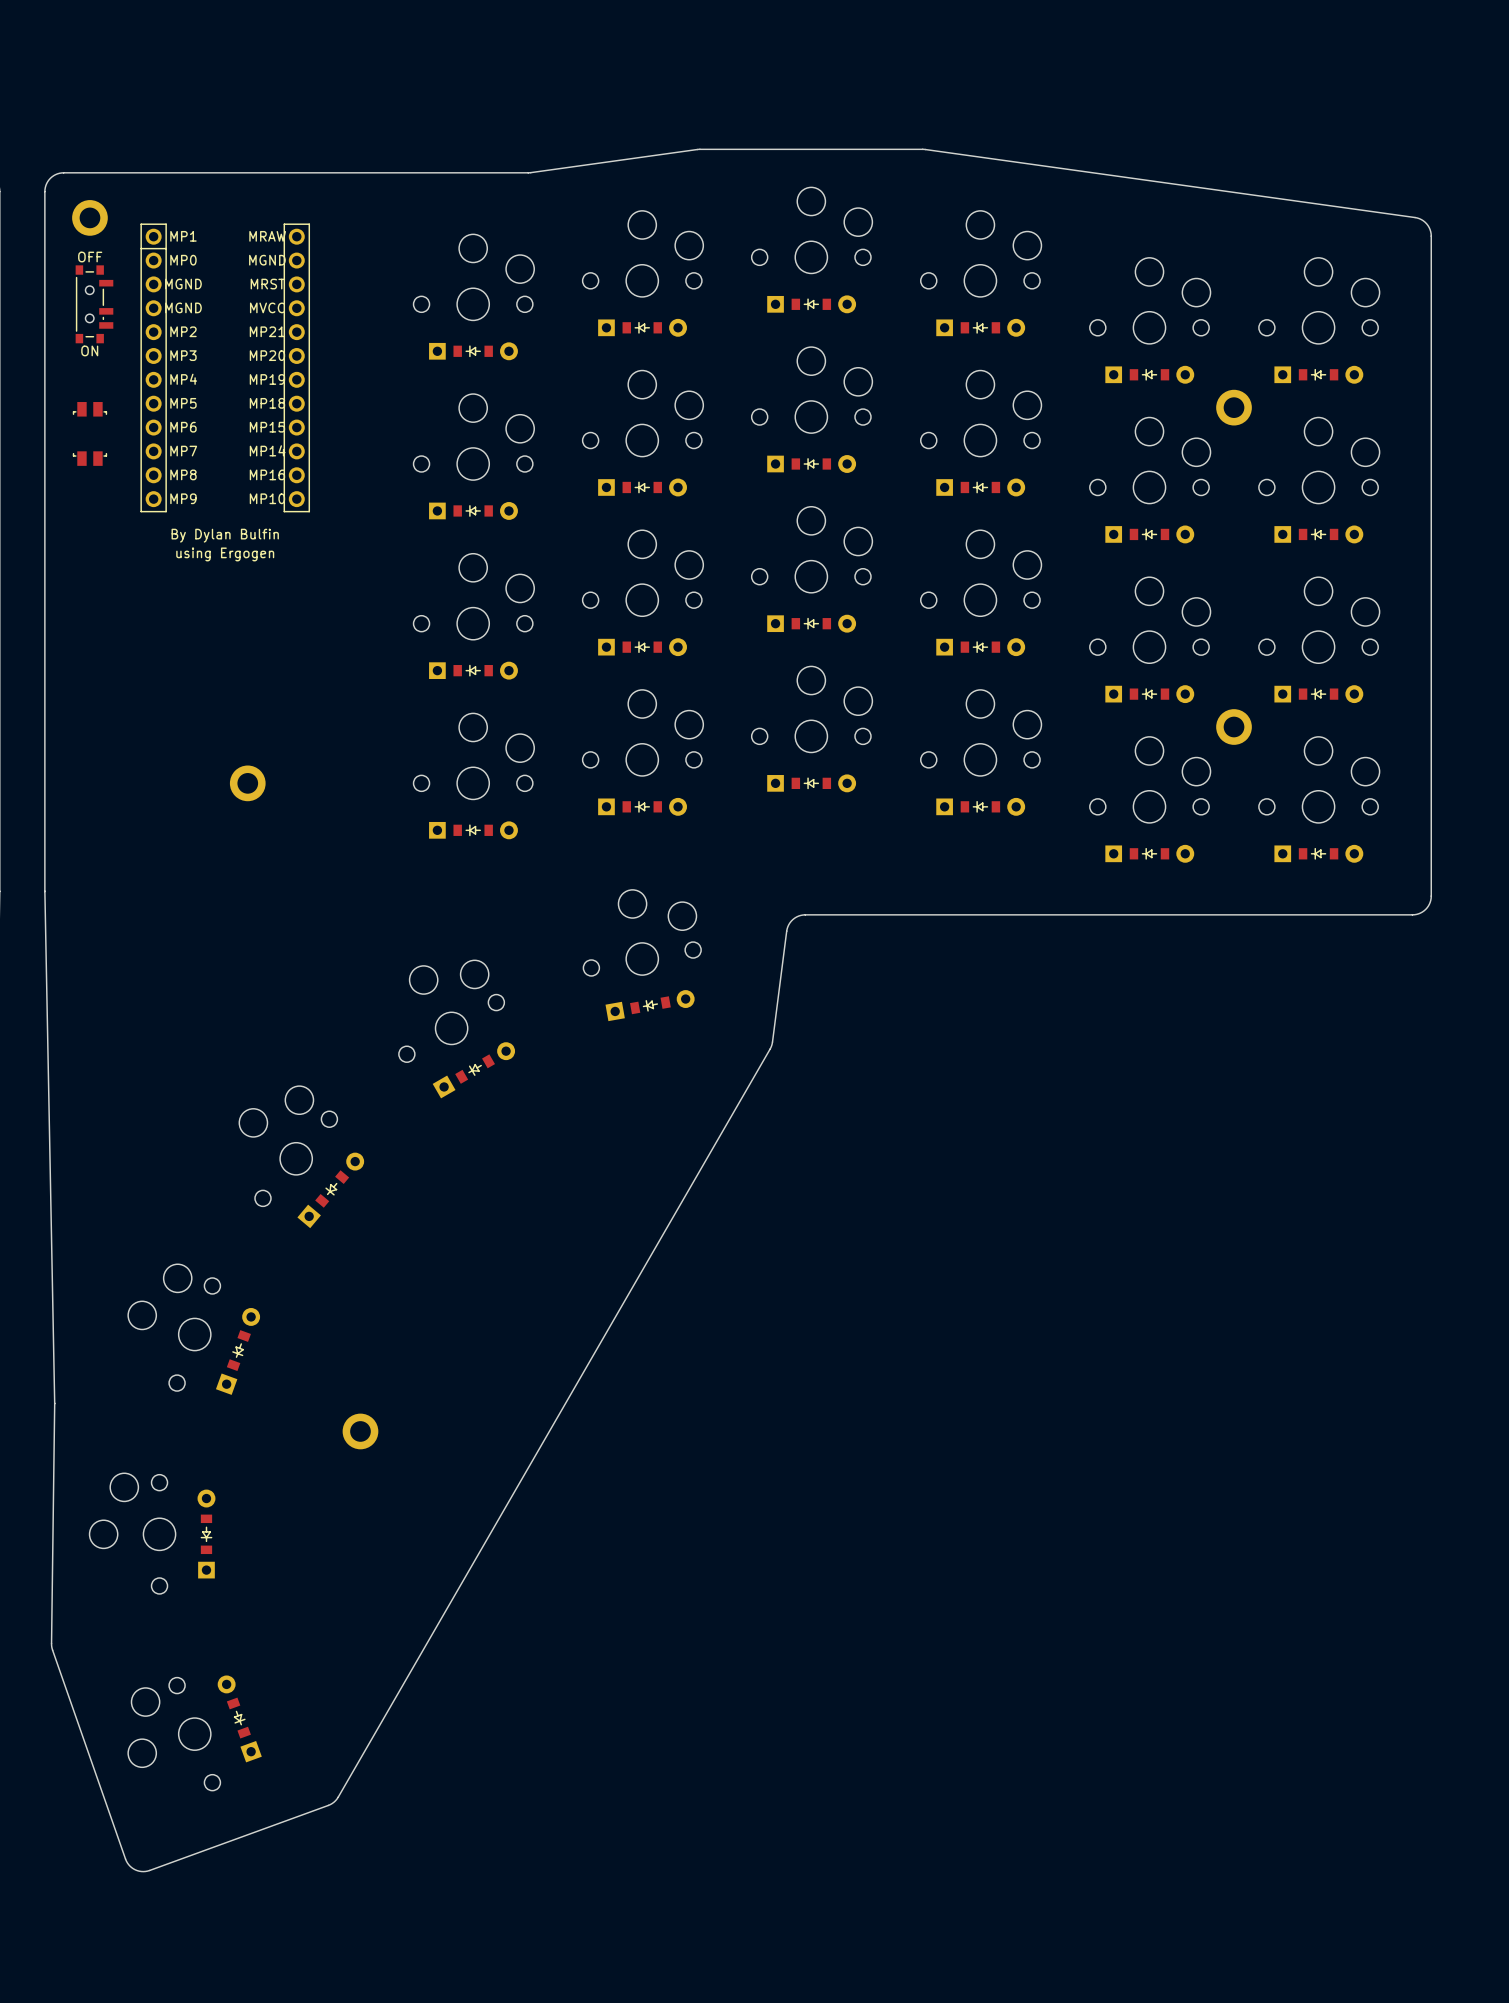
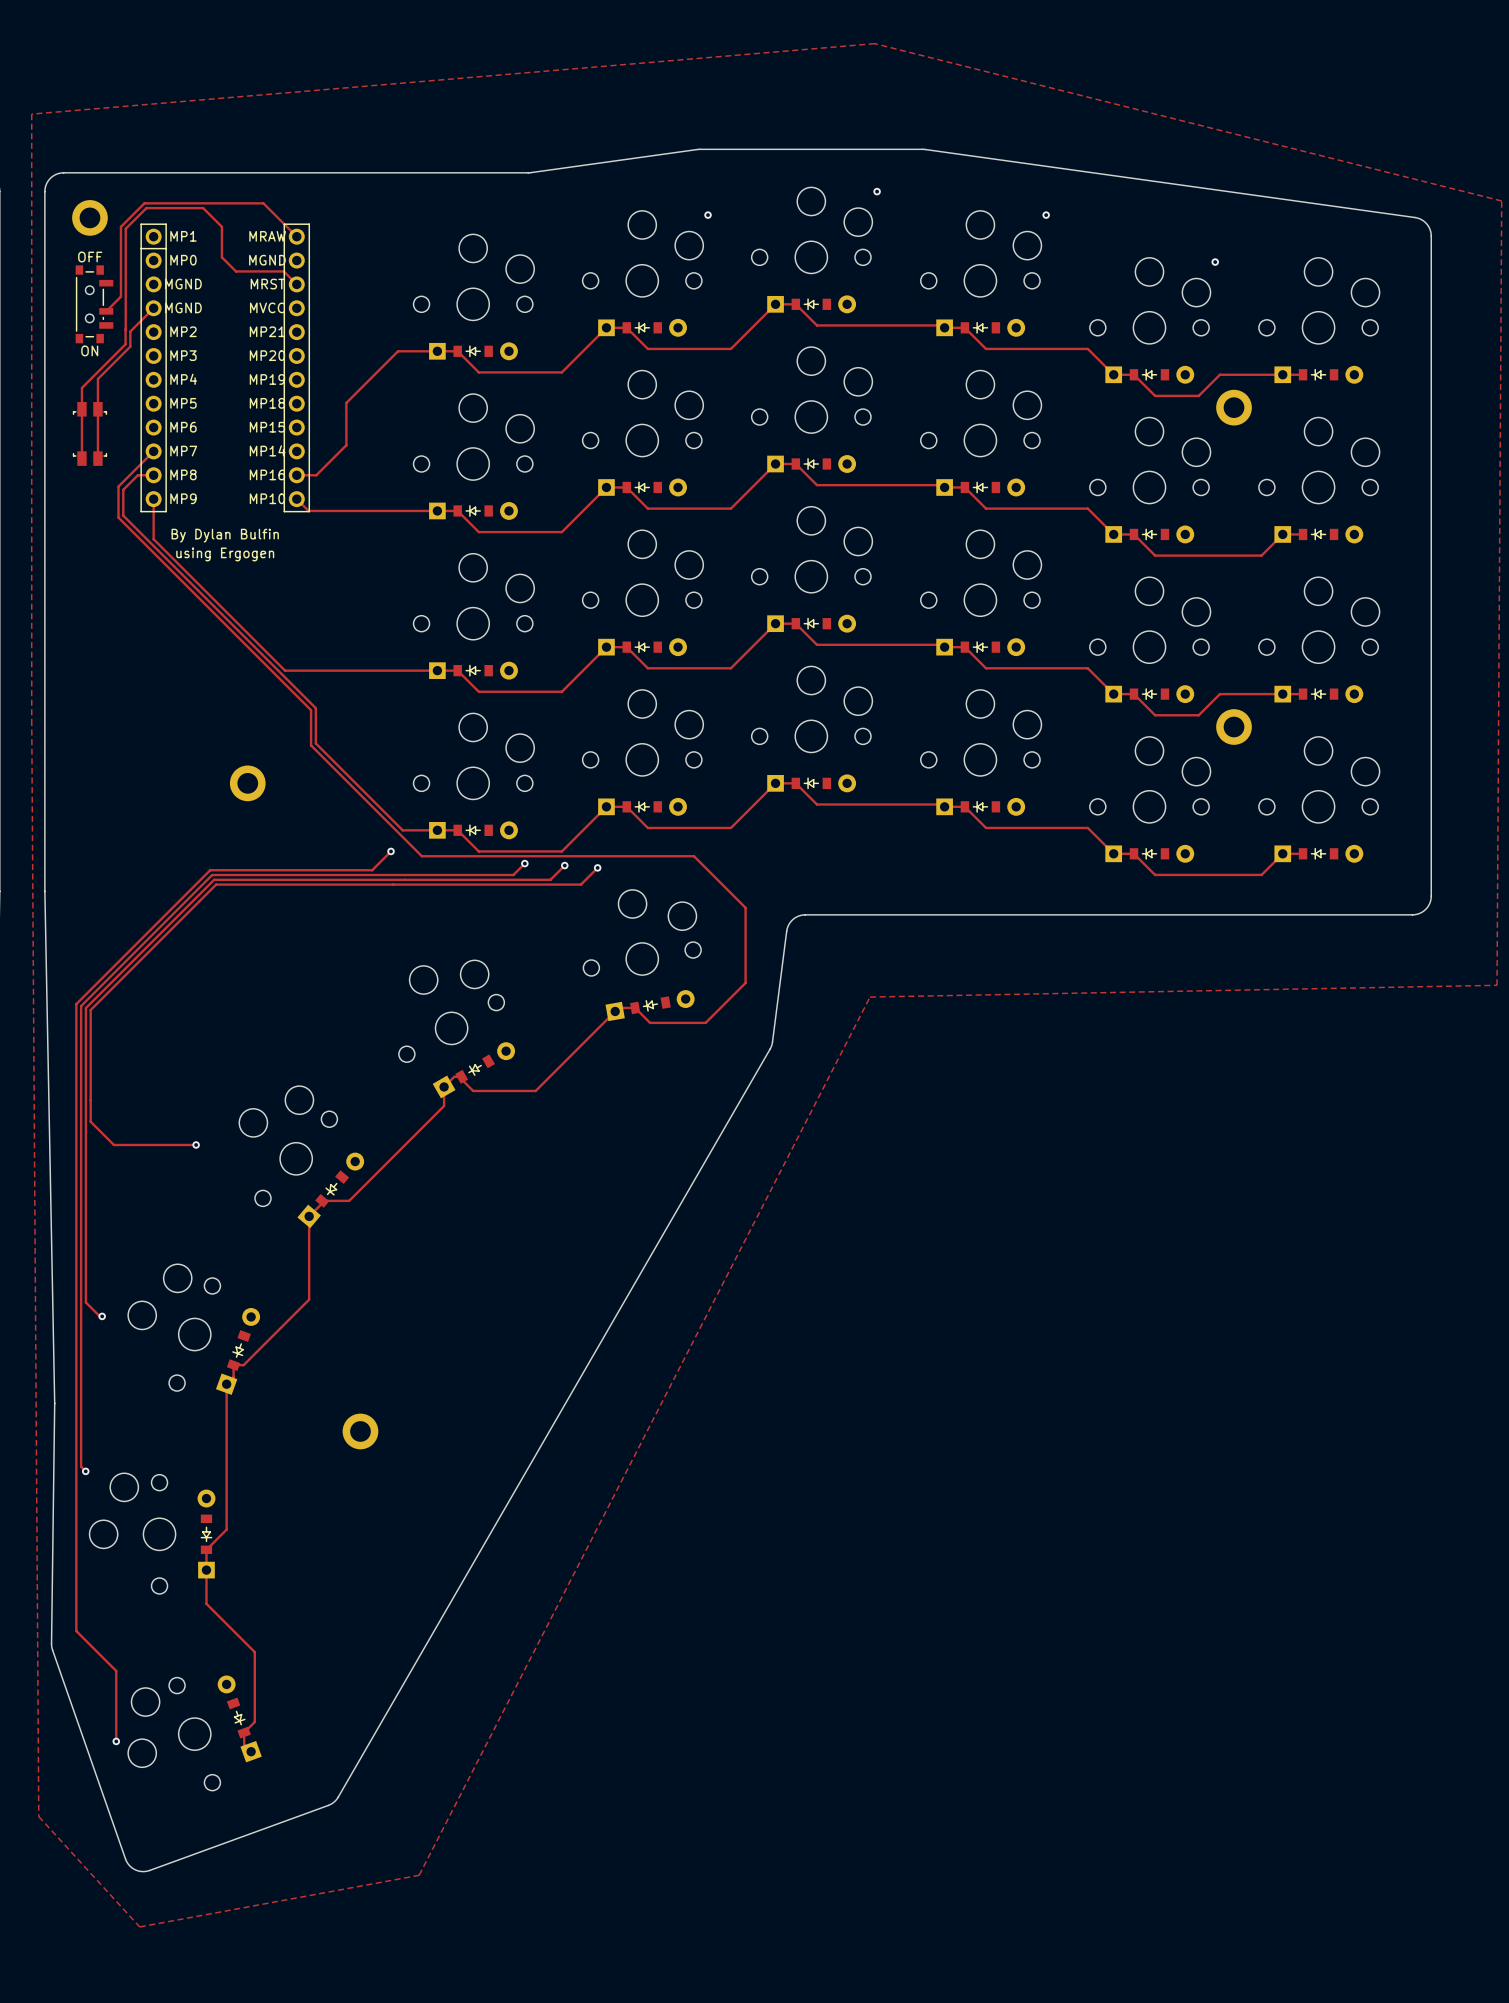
zone outline: none -> (874, 43) (1501, 201) (1497, 985) (870, 997) (419, 1875) (139, 1926) (38, 1816) (31, 719) (31, 114) (874, 43)
via: none -> (877, 191)
via: none -> (708, 215)
via: none -> (1046, 215)
track: none -> (296, 236) (263, 203) (144, 203) (120, 226) (120, 296) (106, 311)
via: none -> (1215, 262)
track: none -> (296, 284) (283, 271) (236, 271) (221, 257) (221, 226) (203, 208) (146, 208) (125, 228) (125, 344) (81, 387) (81, 458)
track: none -> (153, 308) (130, 331) (130, 346) (97, 378) (97, 458)
track: none -> (1303, 374) (1219, 374) (1198, 395) (1155, 395) (1133, 374) (1113, 374) (1087, 348) (986, 348) (964, 327) (944, 327) (942, 325) (816, 325) (795, 304) (775, 304) (730, 348) (647, 348) (626, 327) (606, 327) (561, 372) (478, 372) (457, 351) (398, 351) (346, 402) (346, 445) (316, 475) (296, 475)
track: none -> (153, 451) (118, 486) (118, 517) (311, 710) (311, 745) (421, 856) (694, 856) (745, 907) (745, 982) (705, 1022) (650, 1022) (635, 1007) (618, 1007) (535, 1090) (473, 1090) (461, 1079) (461, 1076) (454, 1076) (444, 1086) (444, 1105) (349, 1200) (322, 1200) (322, 1203) (309, 1216) (309, 1299) (243, 1365) (233, 1365) (233, 1377) (226, 1384) (226, 1529) (206, 1549) (206, 1603) (254, 1652) (254, 1721) (244, 1732) (244, 1744) (251, 1751)
track: none -> (153, 475) (137, 475) (123, 489) (123, 515) (315, 708) (315, 743) (402, 830) (457, 830) (478, 851) (561, 851) (606, 806) (626, 806) (647, 827) (730, 827) (775, 783) (795, 783) (816, 804) (942, 804) (944, 806) (964, 806) (986, 827) (1087, 827) (1113, 853) (1133, 853) (1155, 874) (1261, 874) (1282, 853) (1303, 853)
track: none -> (153, 499) (153, 539) (285, 670) (457, 670) (478, 691) (561, 691) (606, 647) (626, 647) (647, 668) (730, 668) (775, 623) (795, 623) (816, 644) (942, 644) (944, 647) (964, 647) (986, 668) (1087, 668) (1113, 694) (1133, 694) (1155, 715) (1198, 715) (1219, 694) (1303, 694)
track: none -> (296, 499) (308, 510) (457, 510) (478, 532) (561, 532) (606, 487) (626, 487) (647, 508) (730, 508) (775, 464) (795, 464) (816, 485) (942, 485) (944, 487) (964, 487) (986, 508) (1087, 508) (1113, 534) (1133, 534) (1155, 555) (1261, 555) (1282, 534) (1303, 534)
track: none -> (391, 851) (372, 870) (210, 870) (76, 1004) (76, 1631) (116, 1670) (116, 1741)
via: none -> (391, 851)
track: none -> (524, 863) (513, 875) (212, 875) (81, 1006) (81, 1466) (85, 1471)
via: none -> (524, 863)
track: none -> (564, 865) (550, 879) (214, 879) (85, 1008) (85, 1302) (99, 1316) (102, 1316)
via: none -> (564, 865)
track: none -> (597, 867) (580, 884) (216, 884) (90, 1010) (90, 1121) (113, 1144) (196, 1144)
via: none -> (597, 867)
via: none -> (196, 1144)
via: none -> (102, 1316)
via: none -> (85, 1471)
via: none -> (116, 1741)

